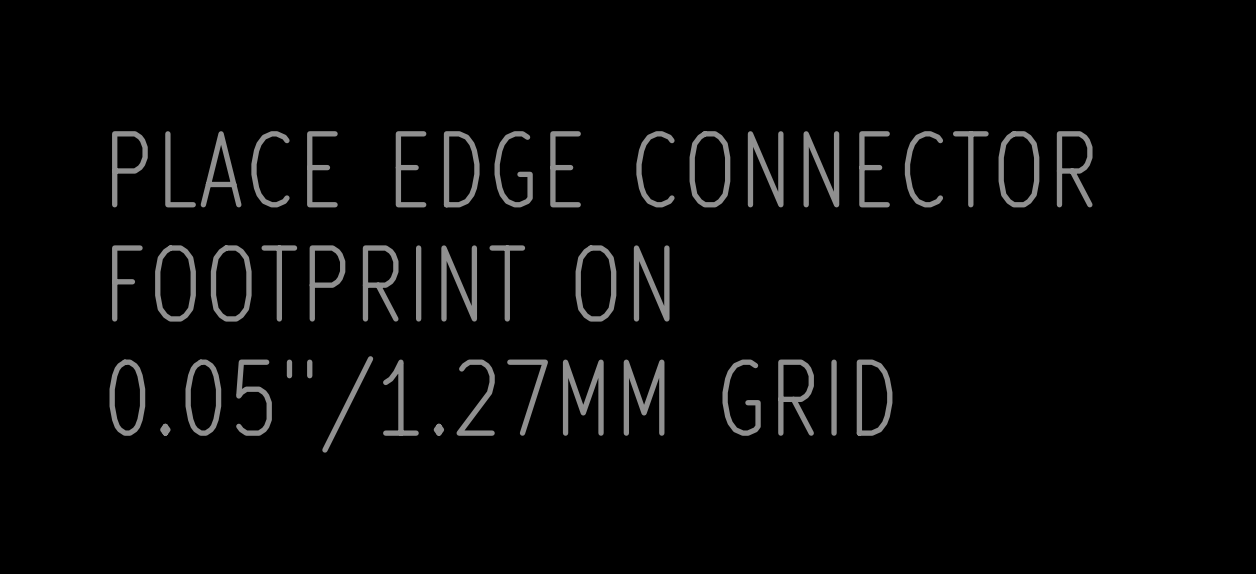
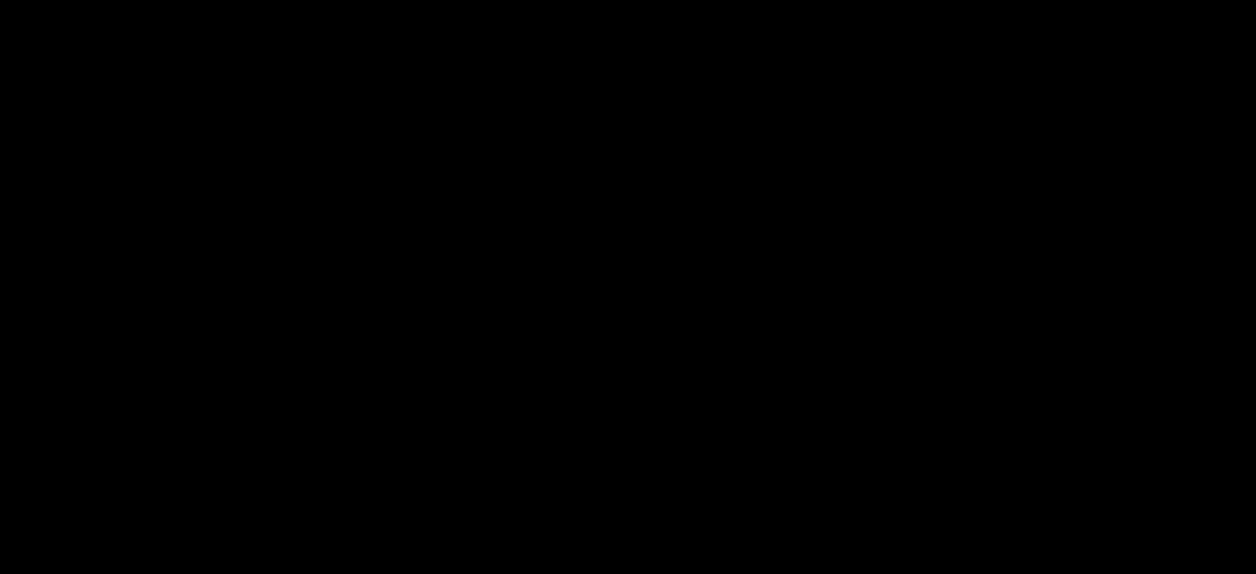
text: PLACE EDGE CONNECTOR (602, 169) -> none
text: FOOTPRINT ON (390, 283) -> none
text: 0.05"/1.27MM GRID (500, 404) -> none

